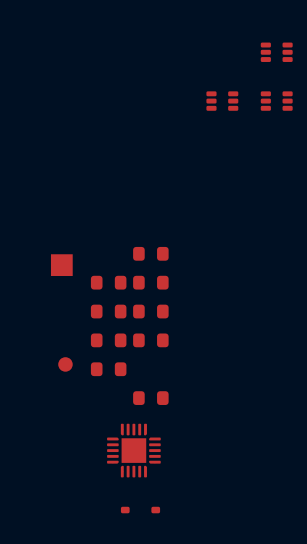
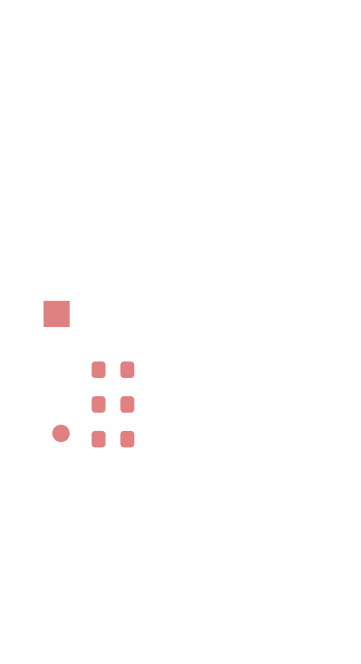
part: (276, 52) -> none
part: (222, 101) -> none
part: (276, 101) -> none
part: (150, 253) -> none
part: (108, 282) -> none
part: (150, 282) -> none
part: (150, 311) -> none
part: (150, 340) -> none
part: (150, 398) -> none
part: (133, 450) -> none
part: (140, 510) -> none

